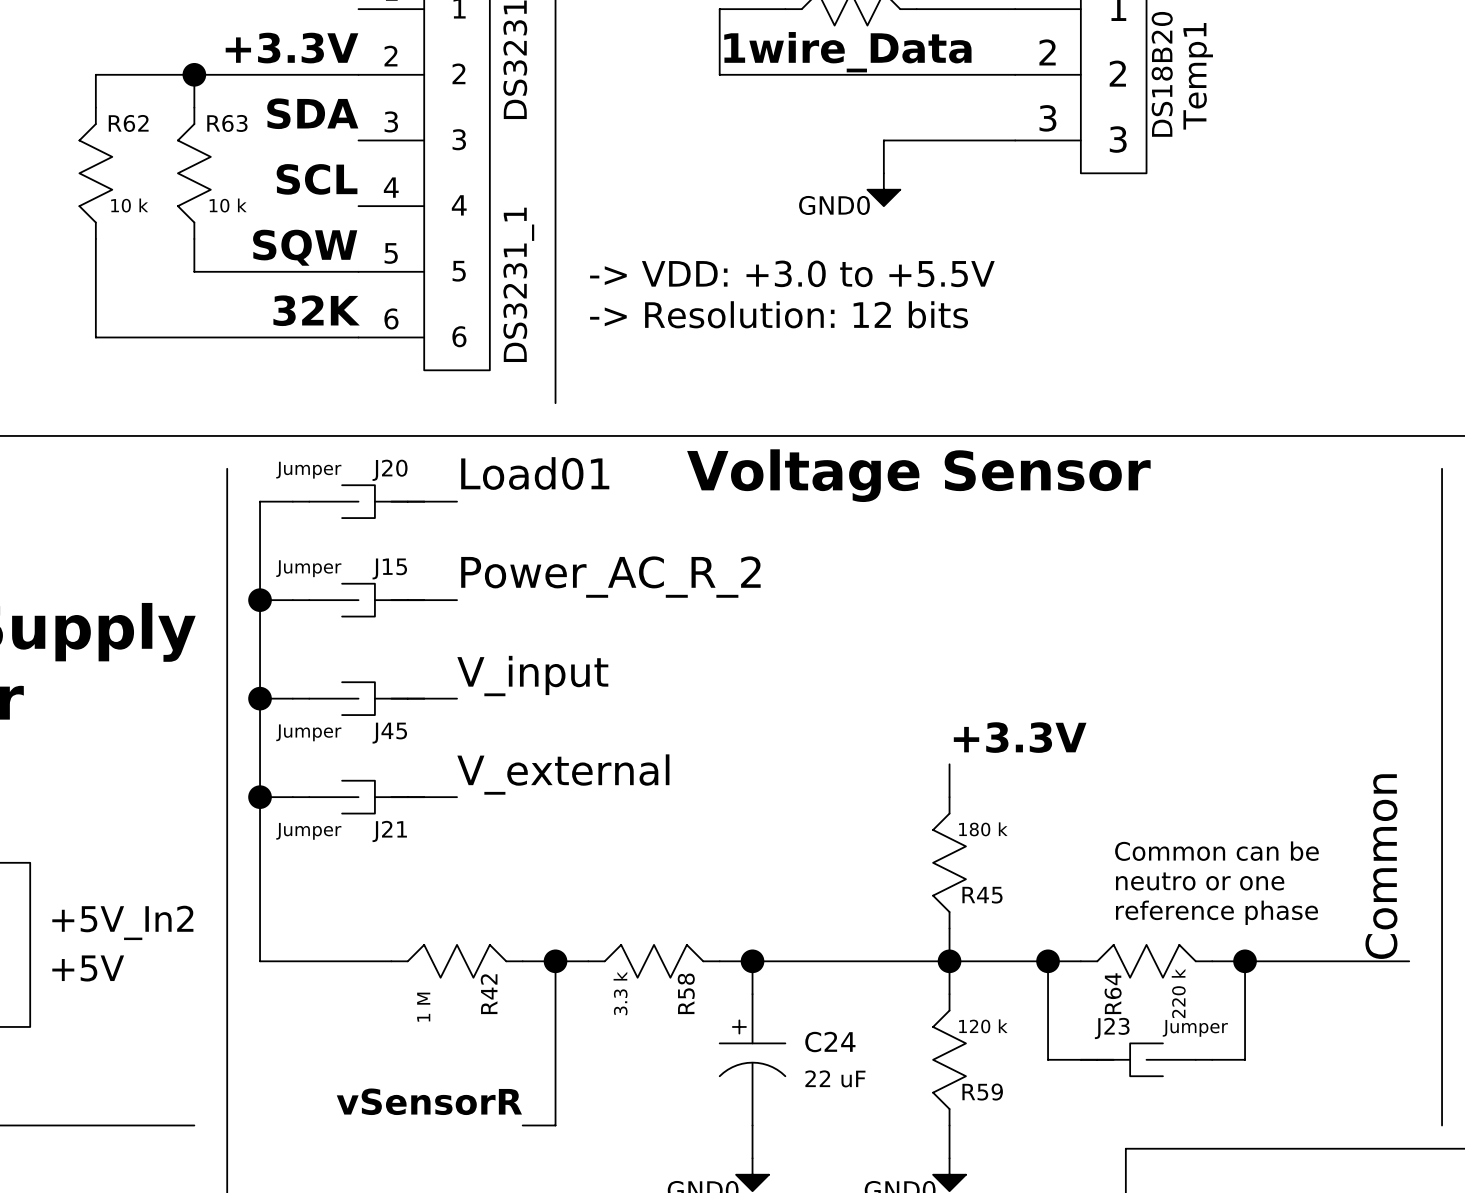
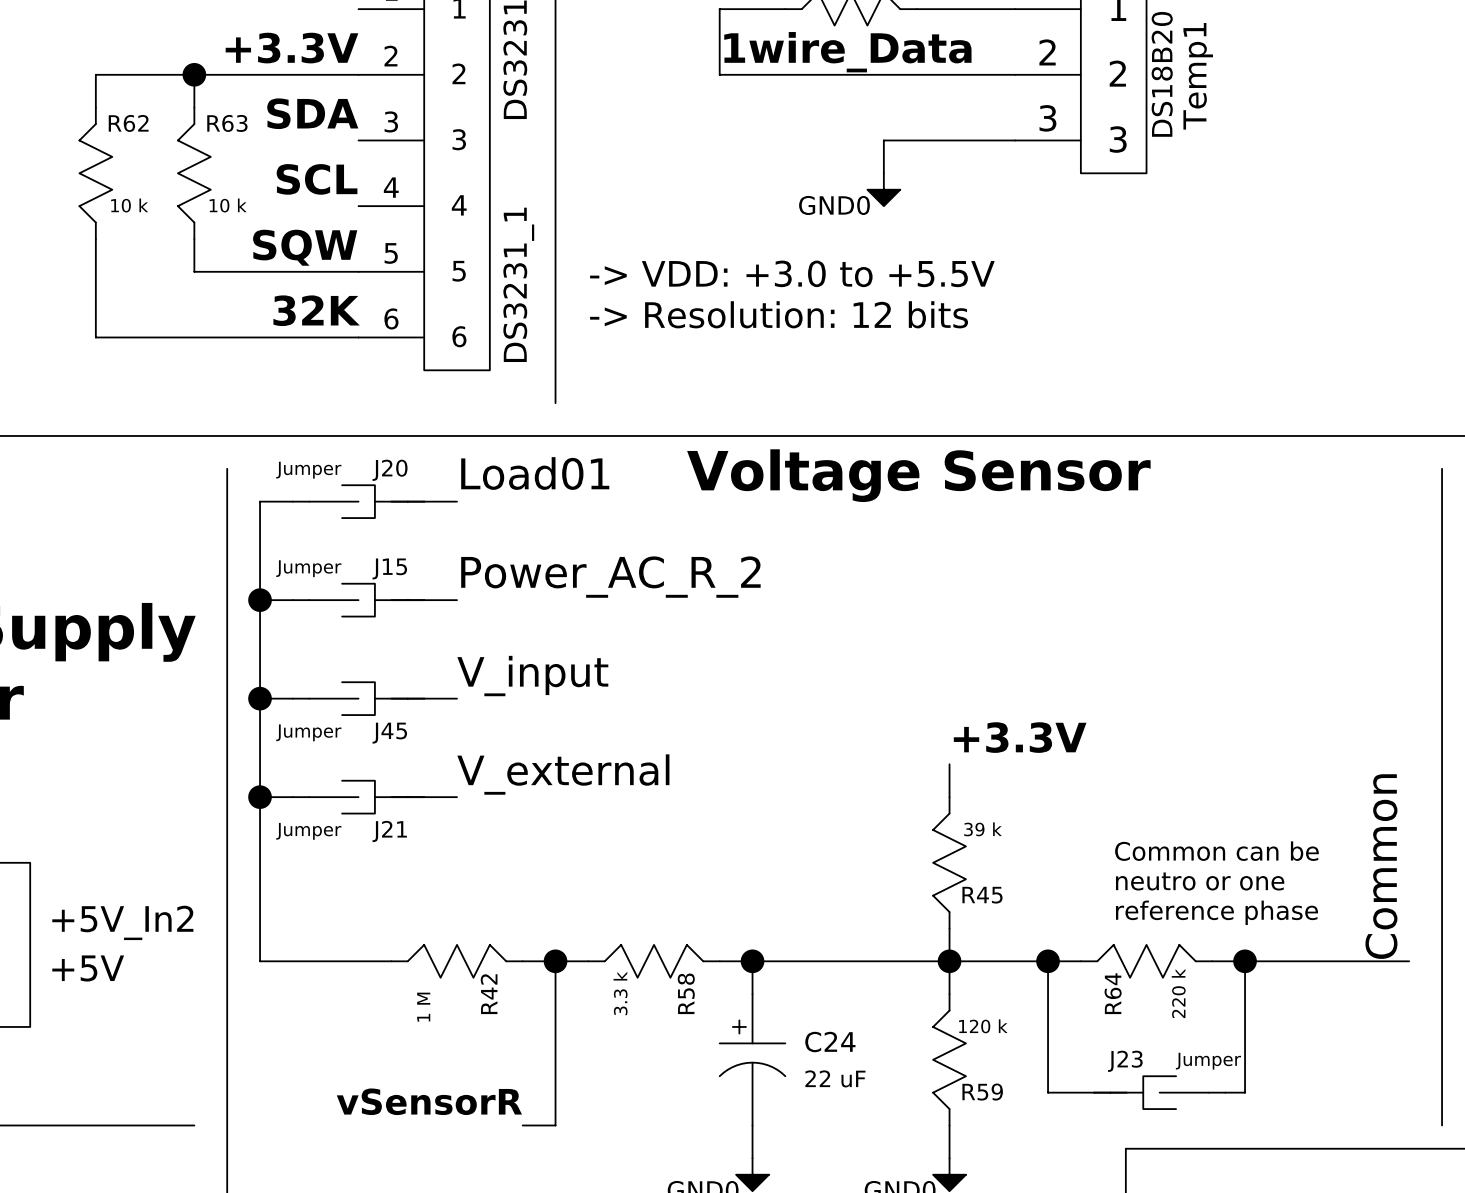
R45 value: 180 k (983, 829) -> 39 k (983, 829)
J23 symbol: [1080, 1043, 1213, 1077] -> [1094, 1076, 1226, 1110]
wire: (1048, 1059) (1080, 1059) -> (1048, 1059) (1048, 1092) (1094, 1092)
wire: (1212, 1059) (1245, 1059) -> (1225, 1092) (1245, 1092) (1245, 1059)

